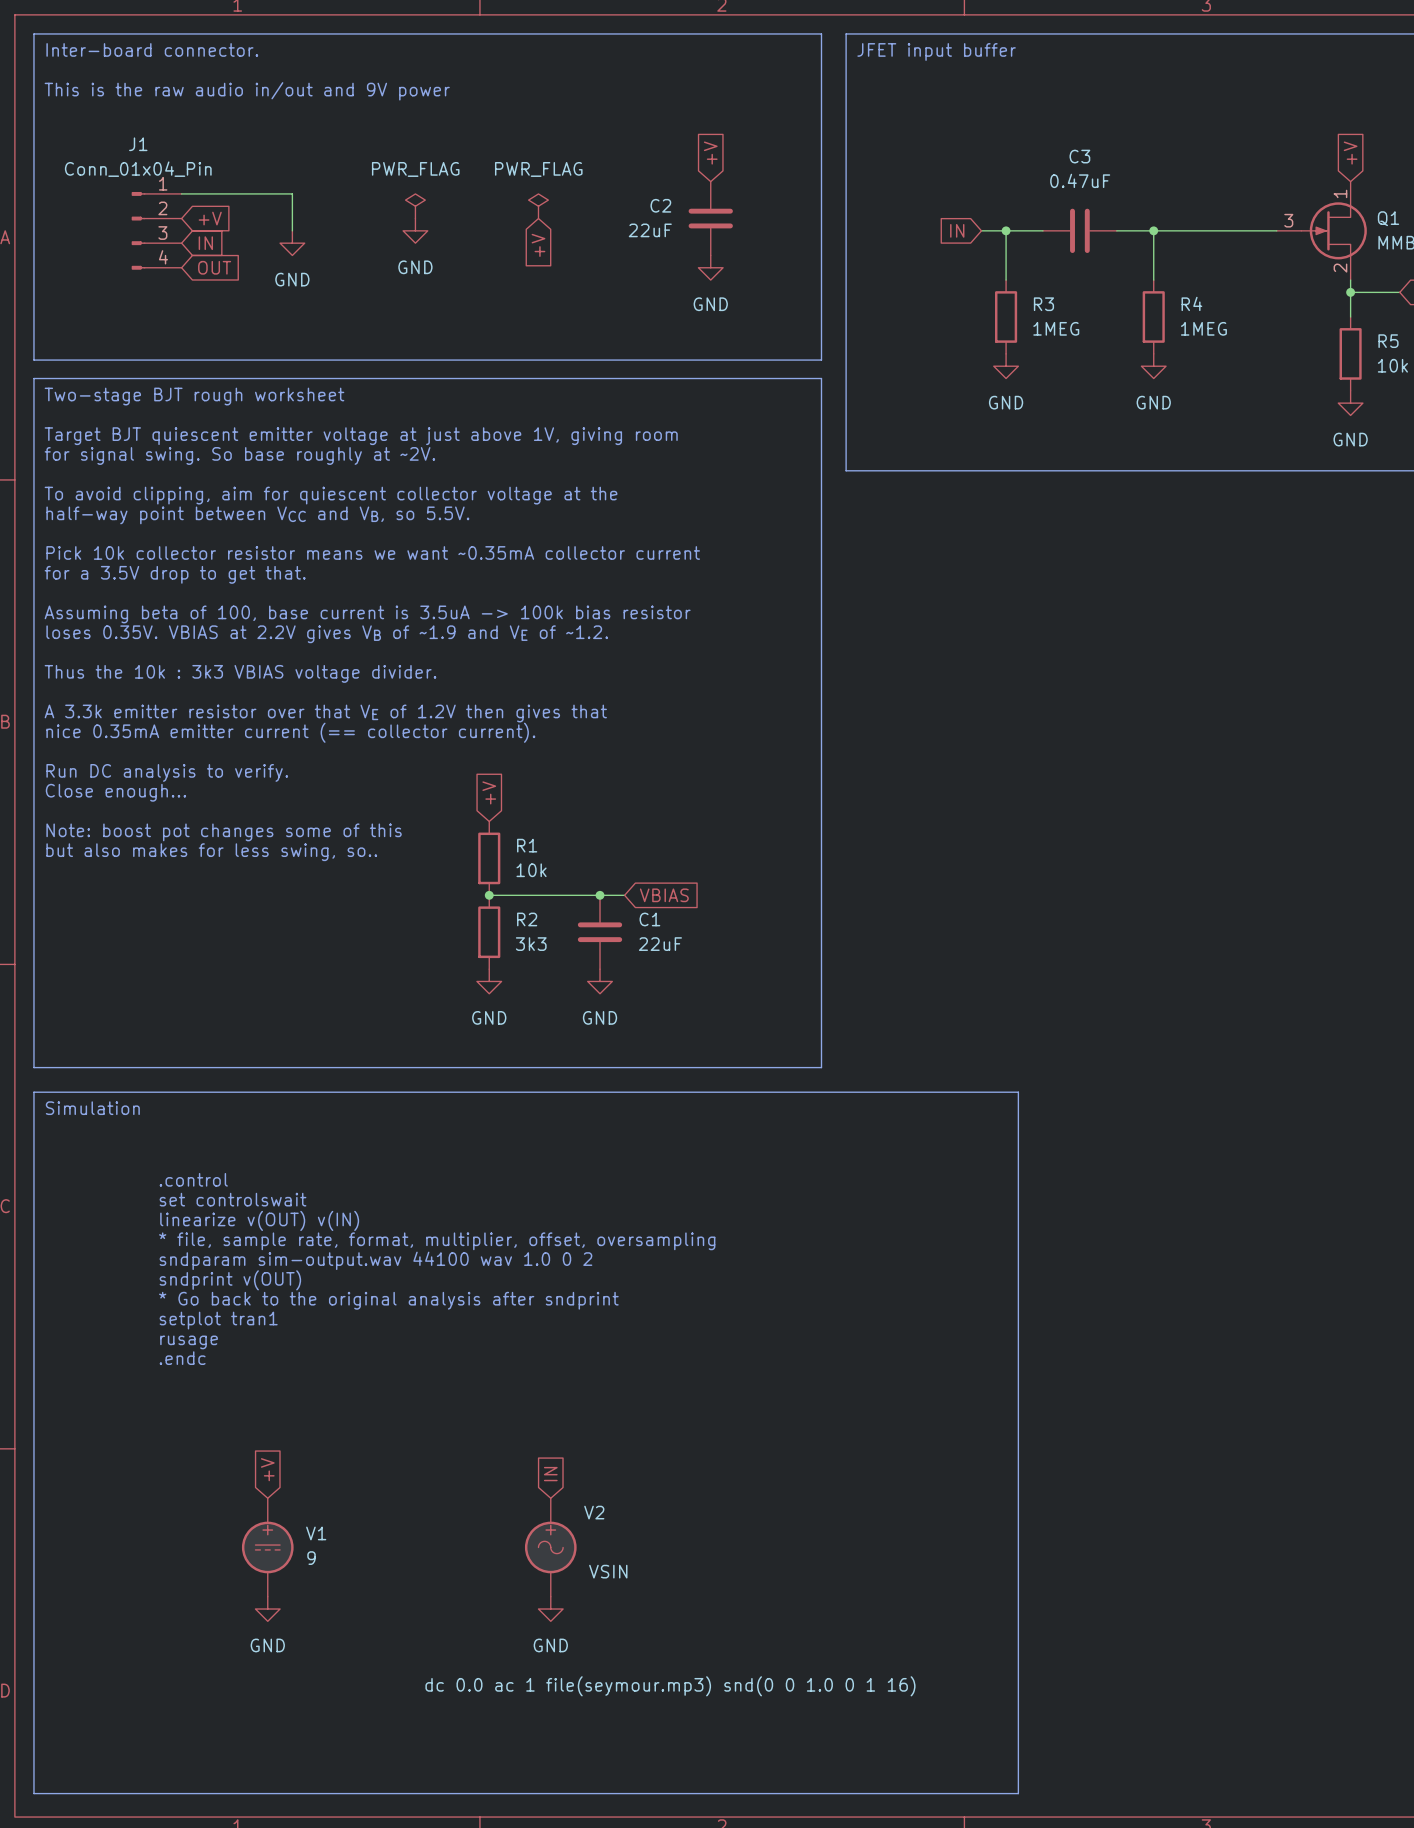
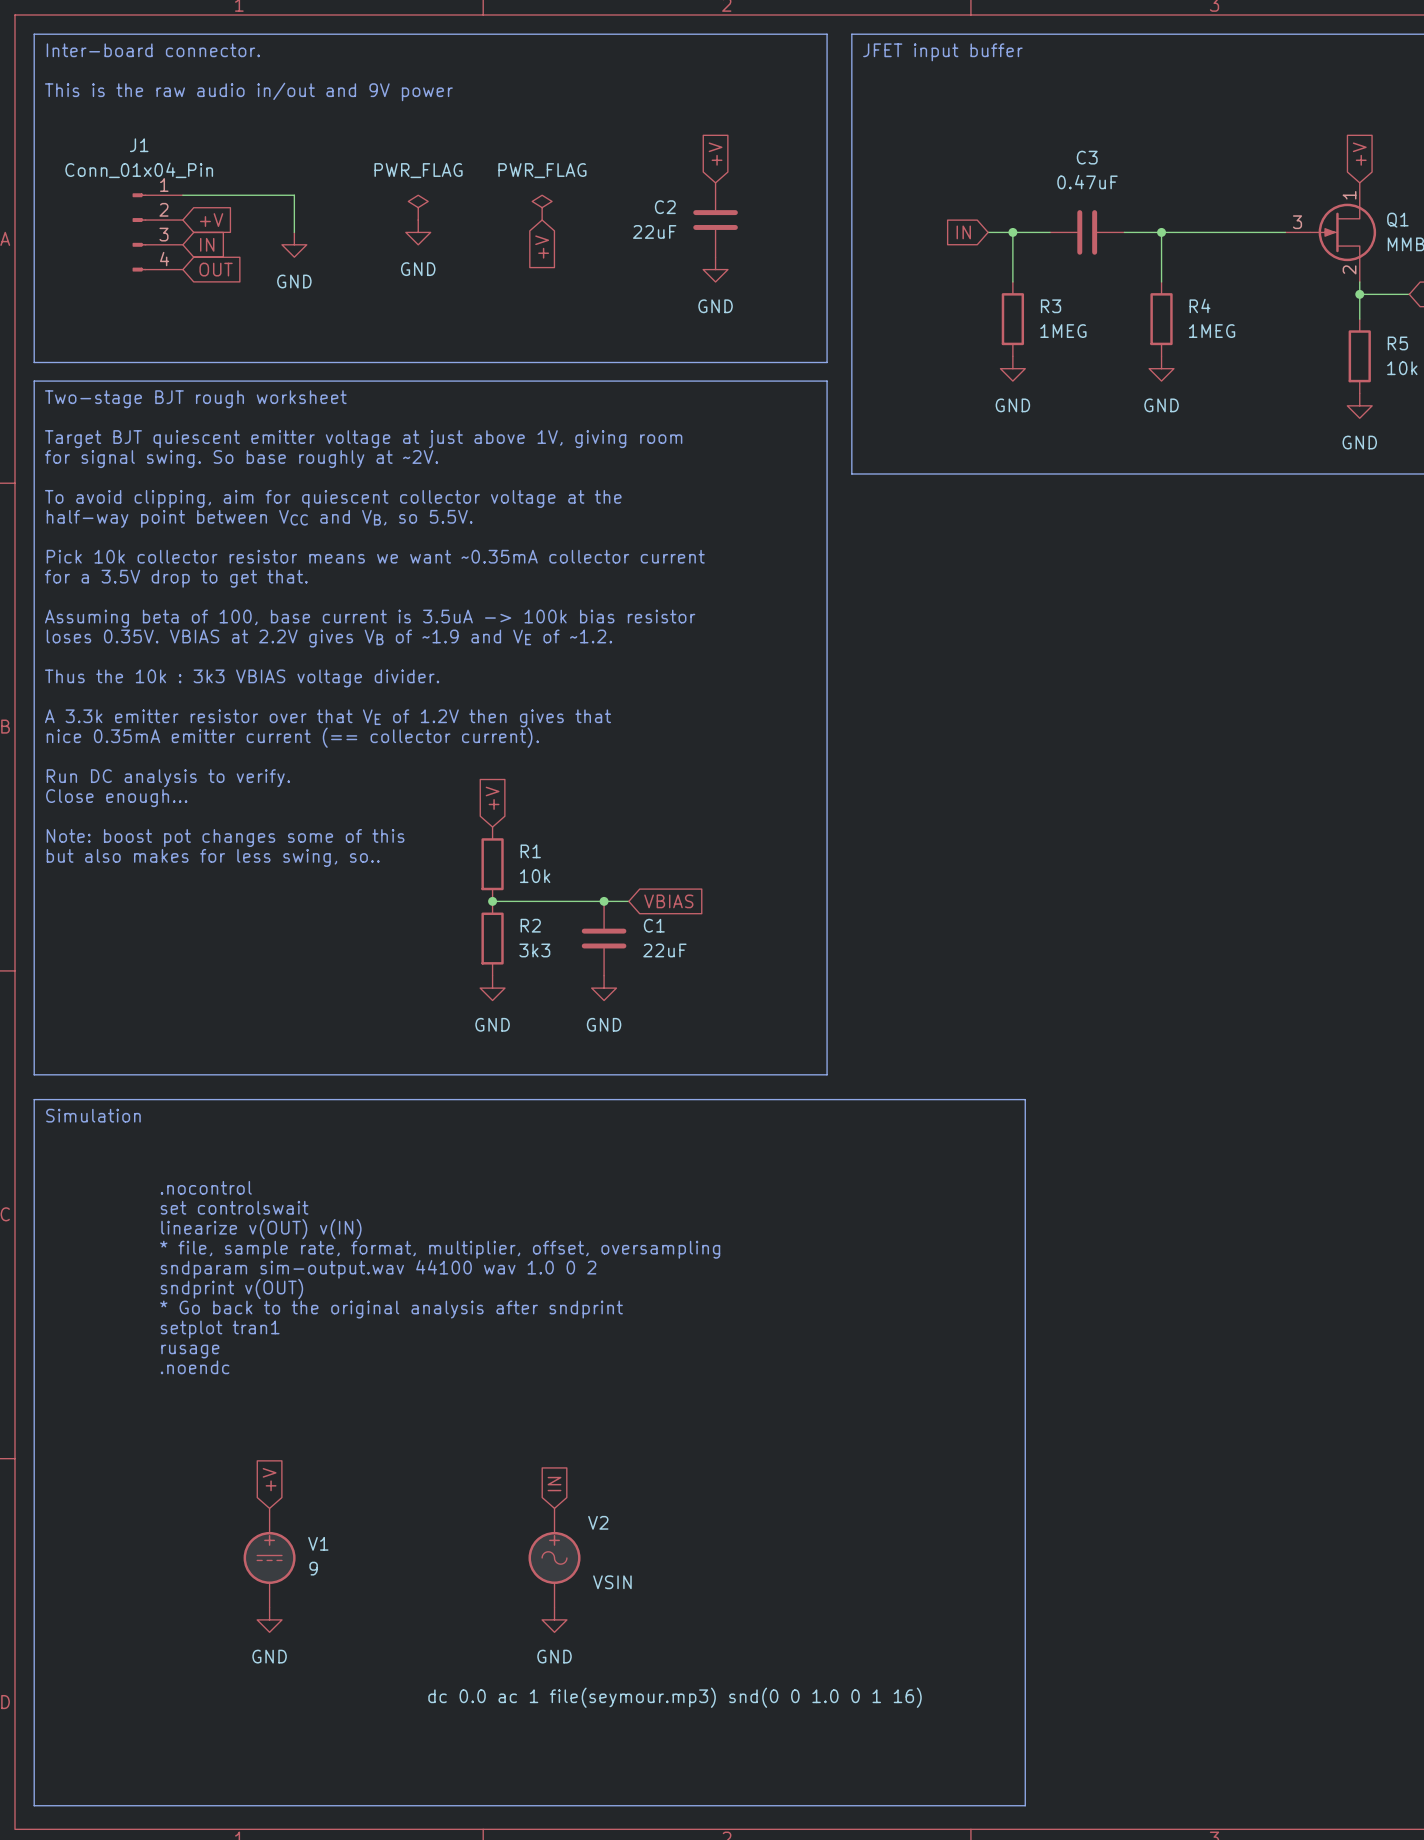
text: .control (193, 1179) -> .nocontrol (206, 1187)
text: .endc (182, 1358) -> .noendc (195, 1367)

